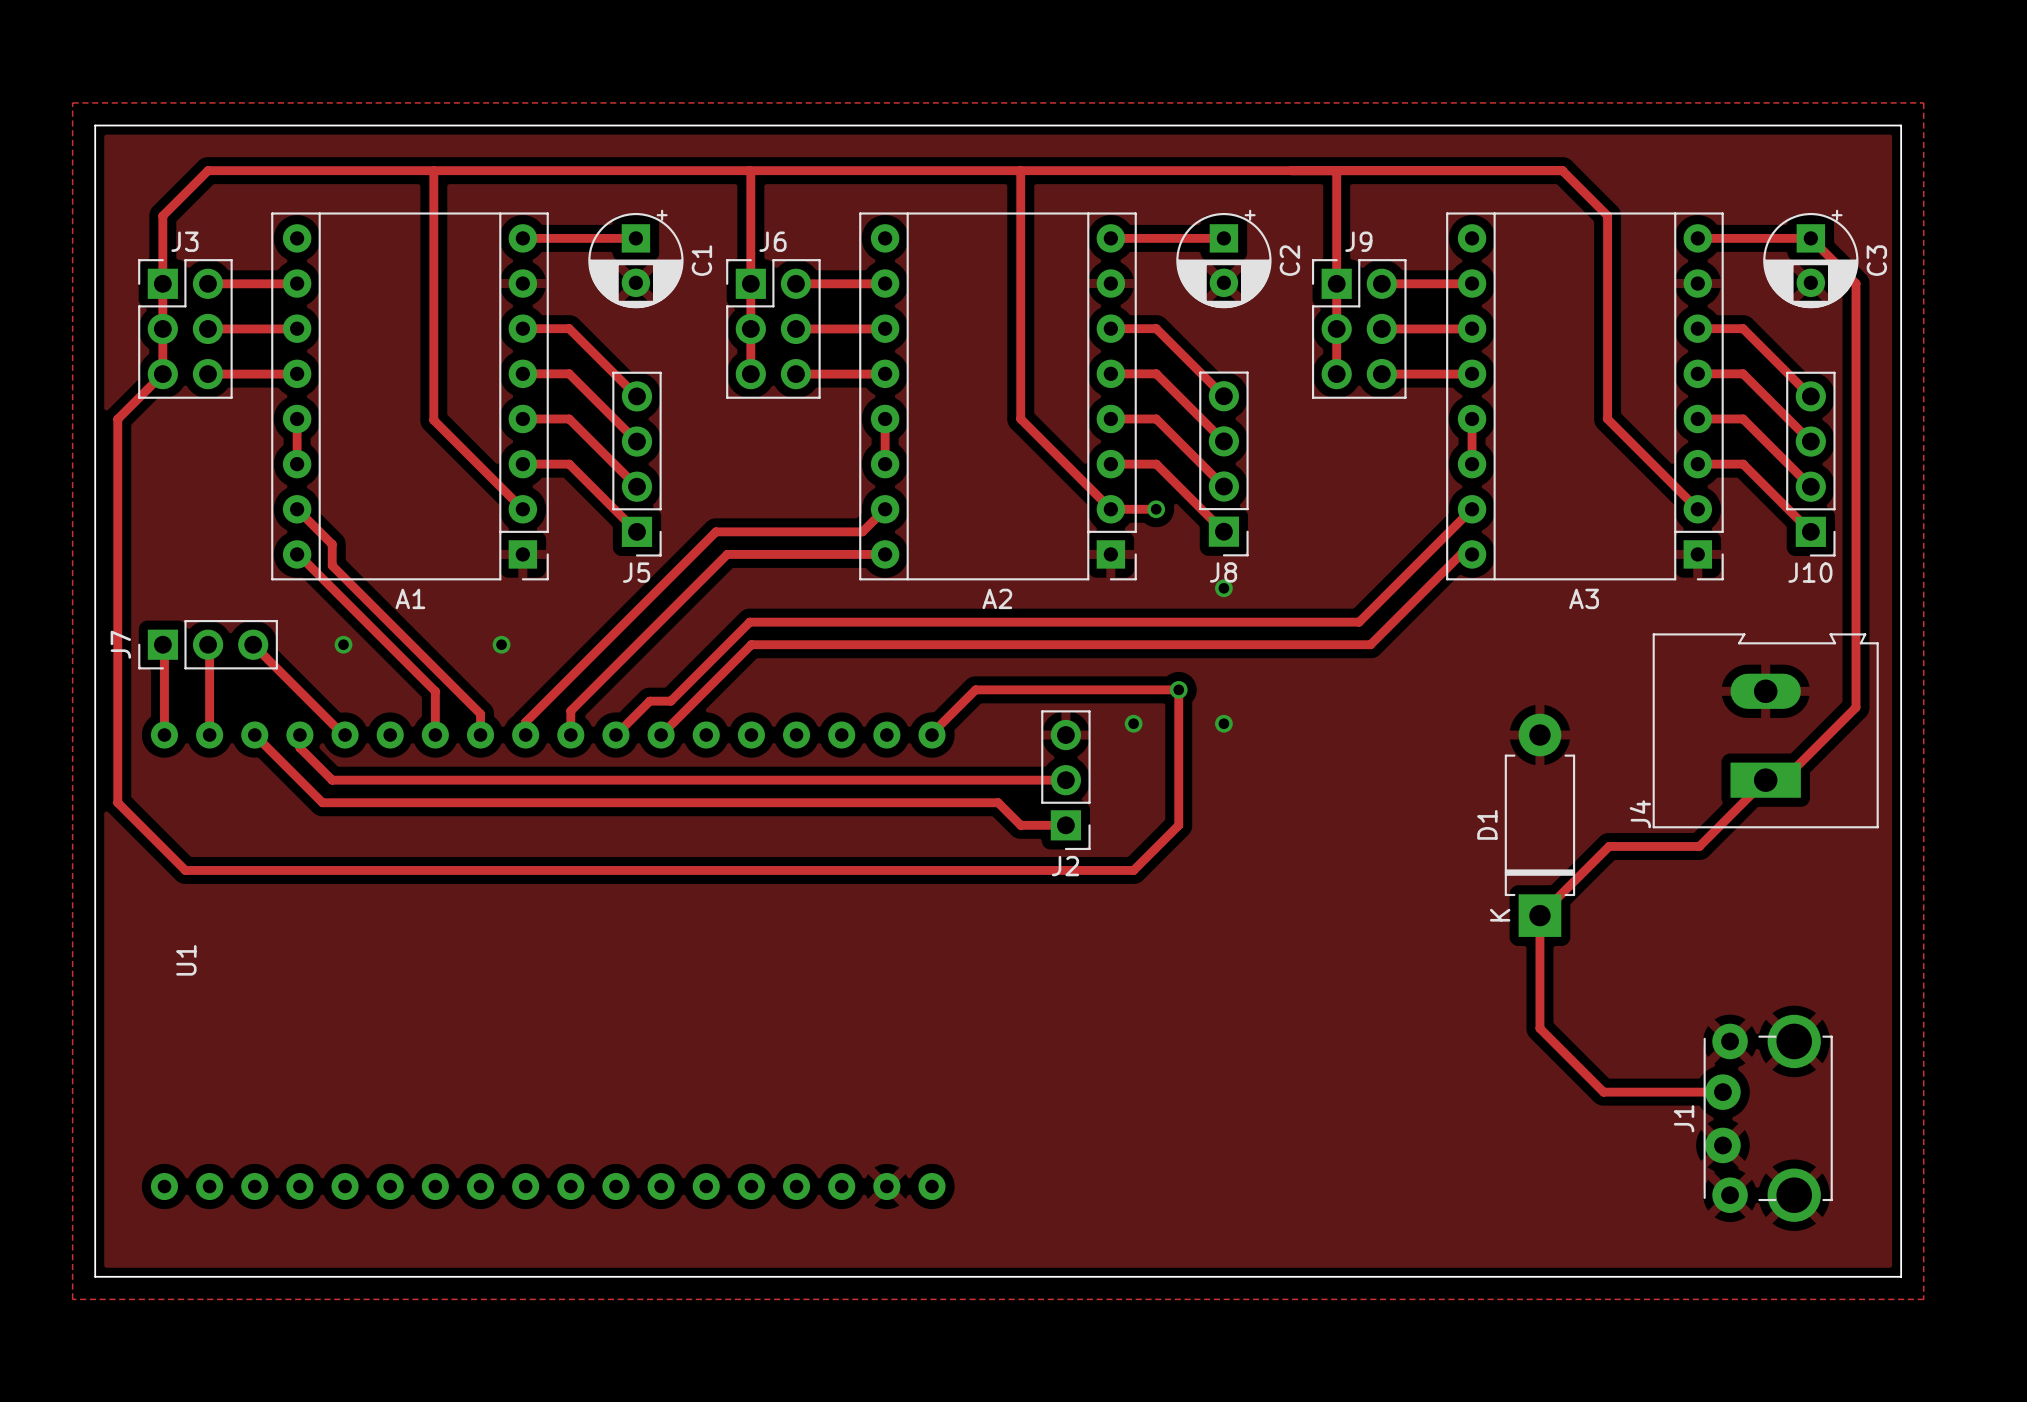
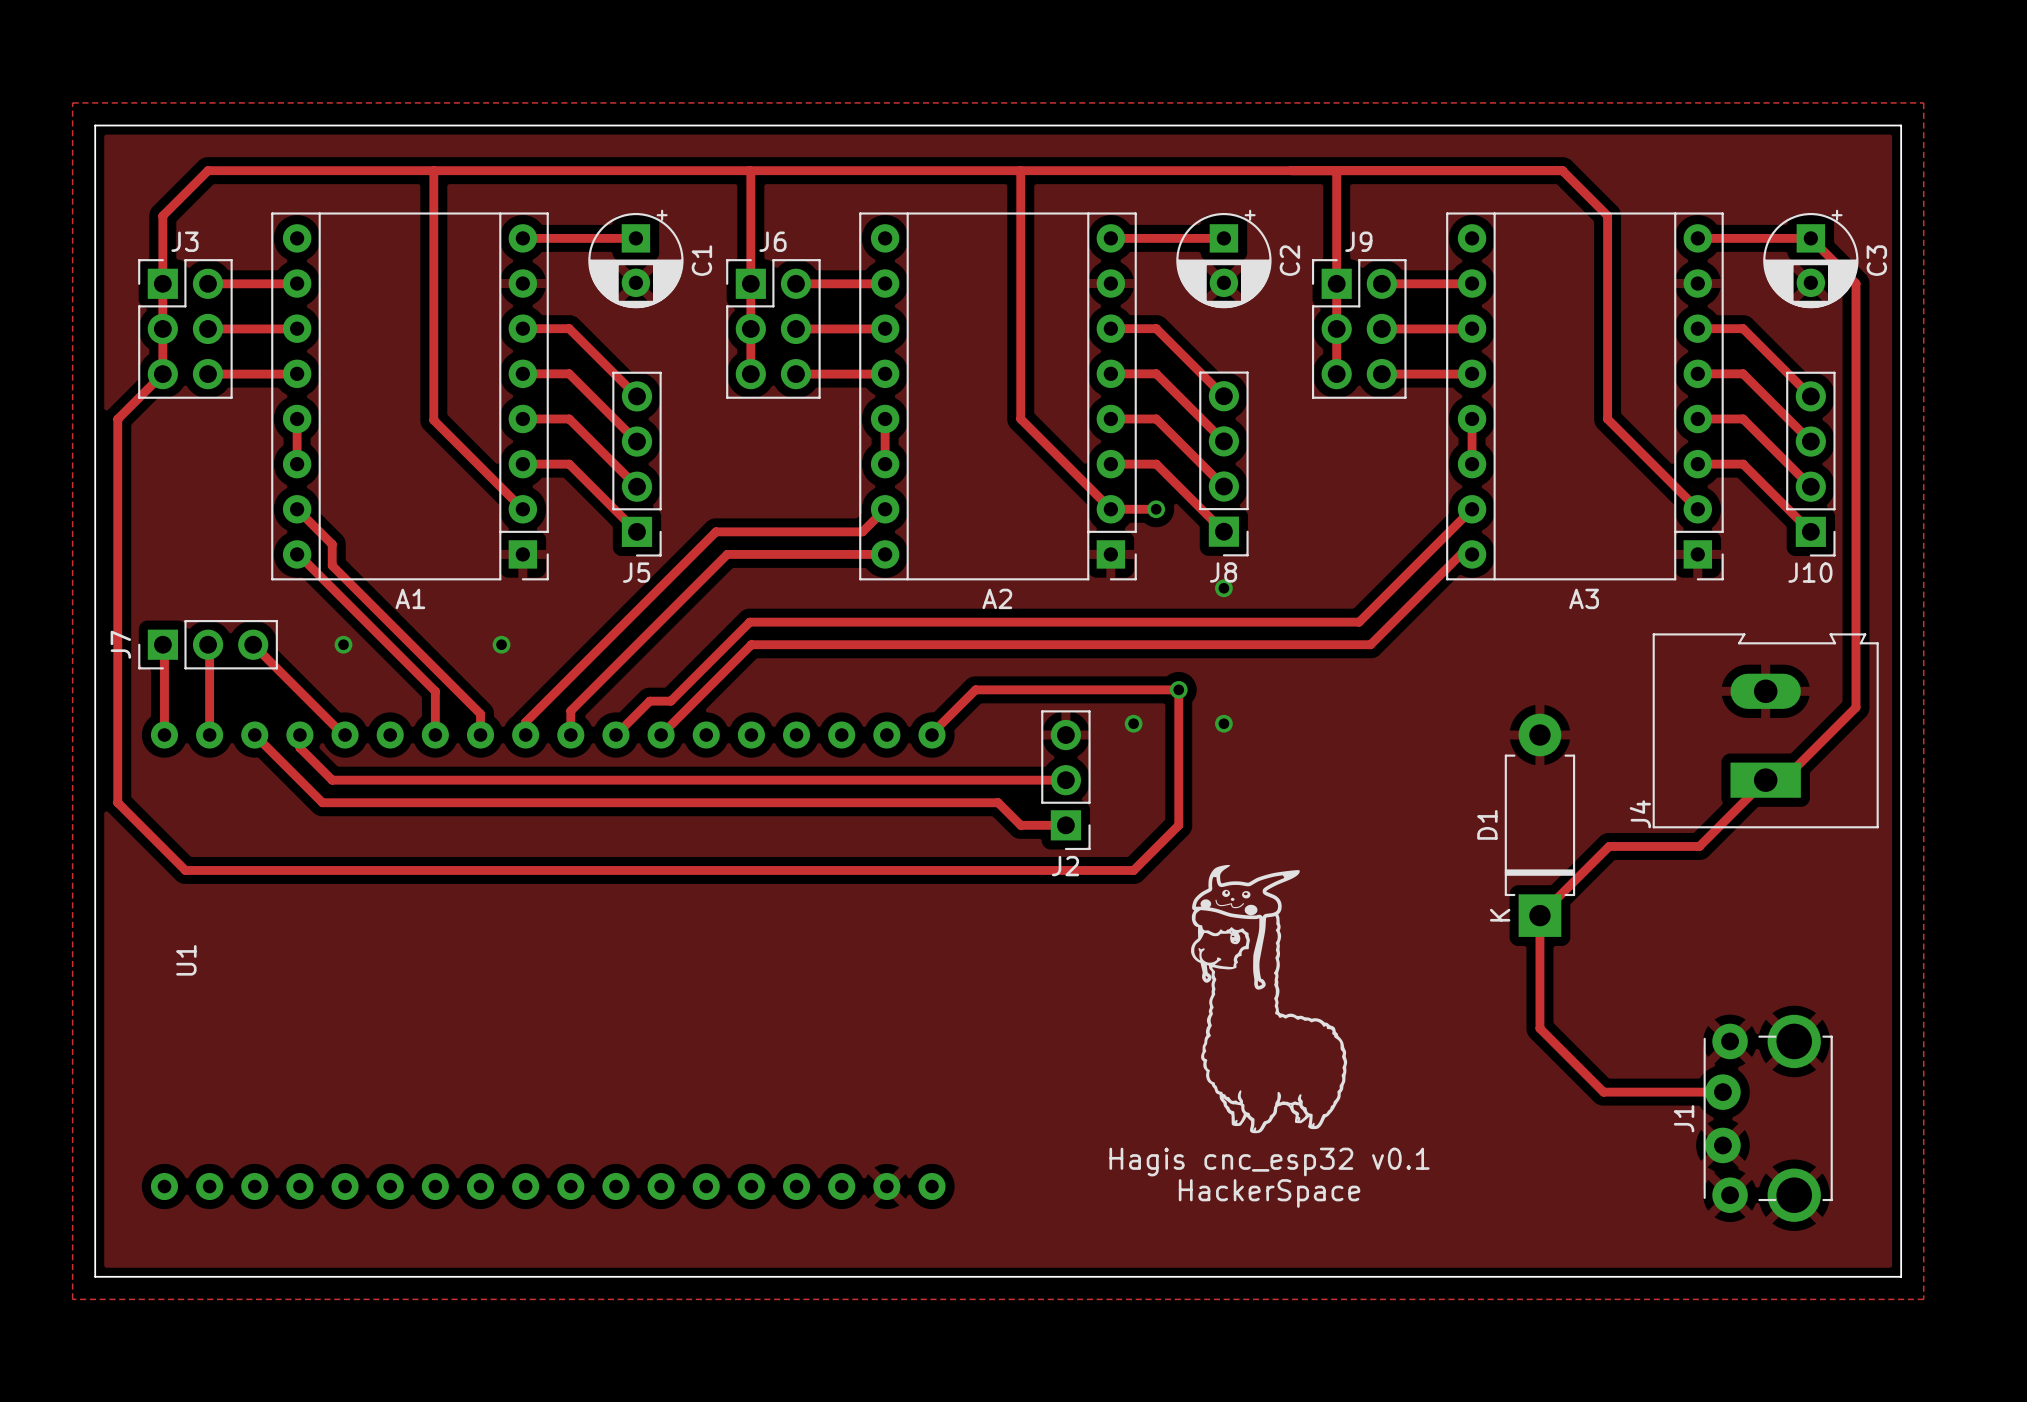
drawing: none -> [1191, 864, 1348, 1134]
text: none -> Hagis cnc_esp32 v0.1 (1269, 1162)
text: none -> HackerSpace (1269, 1193)

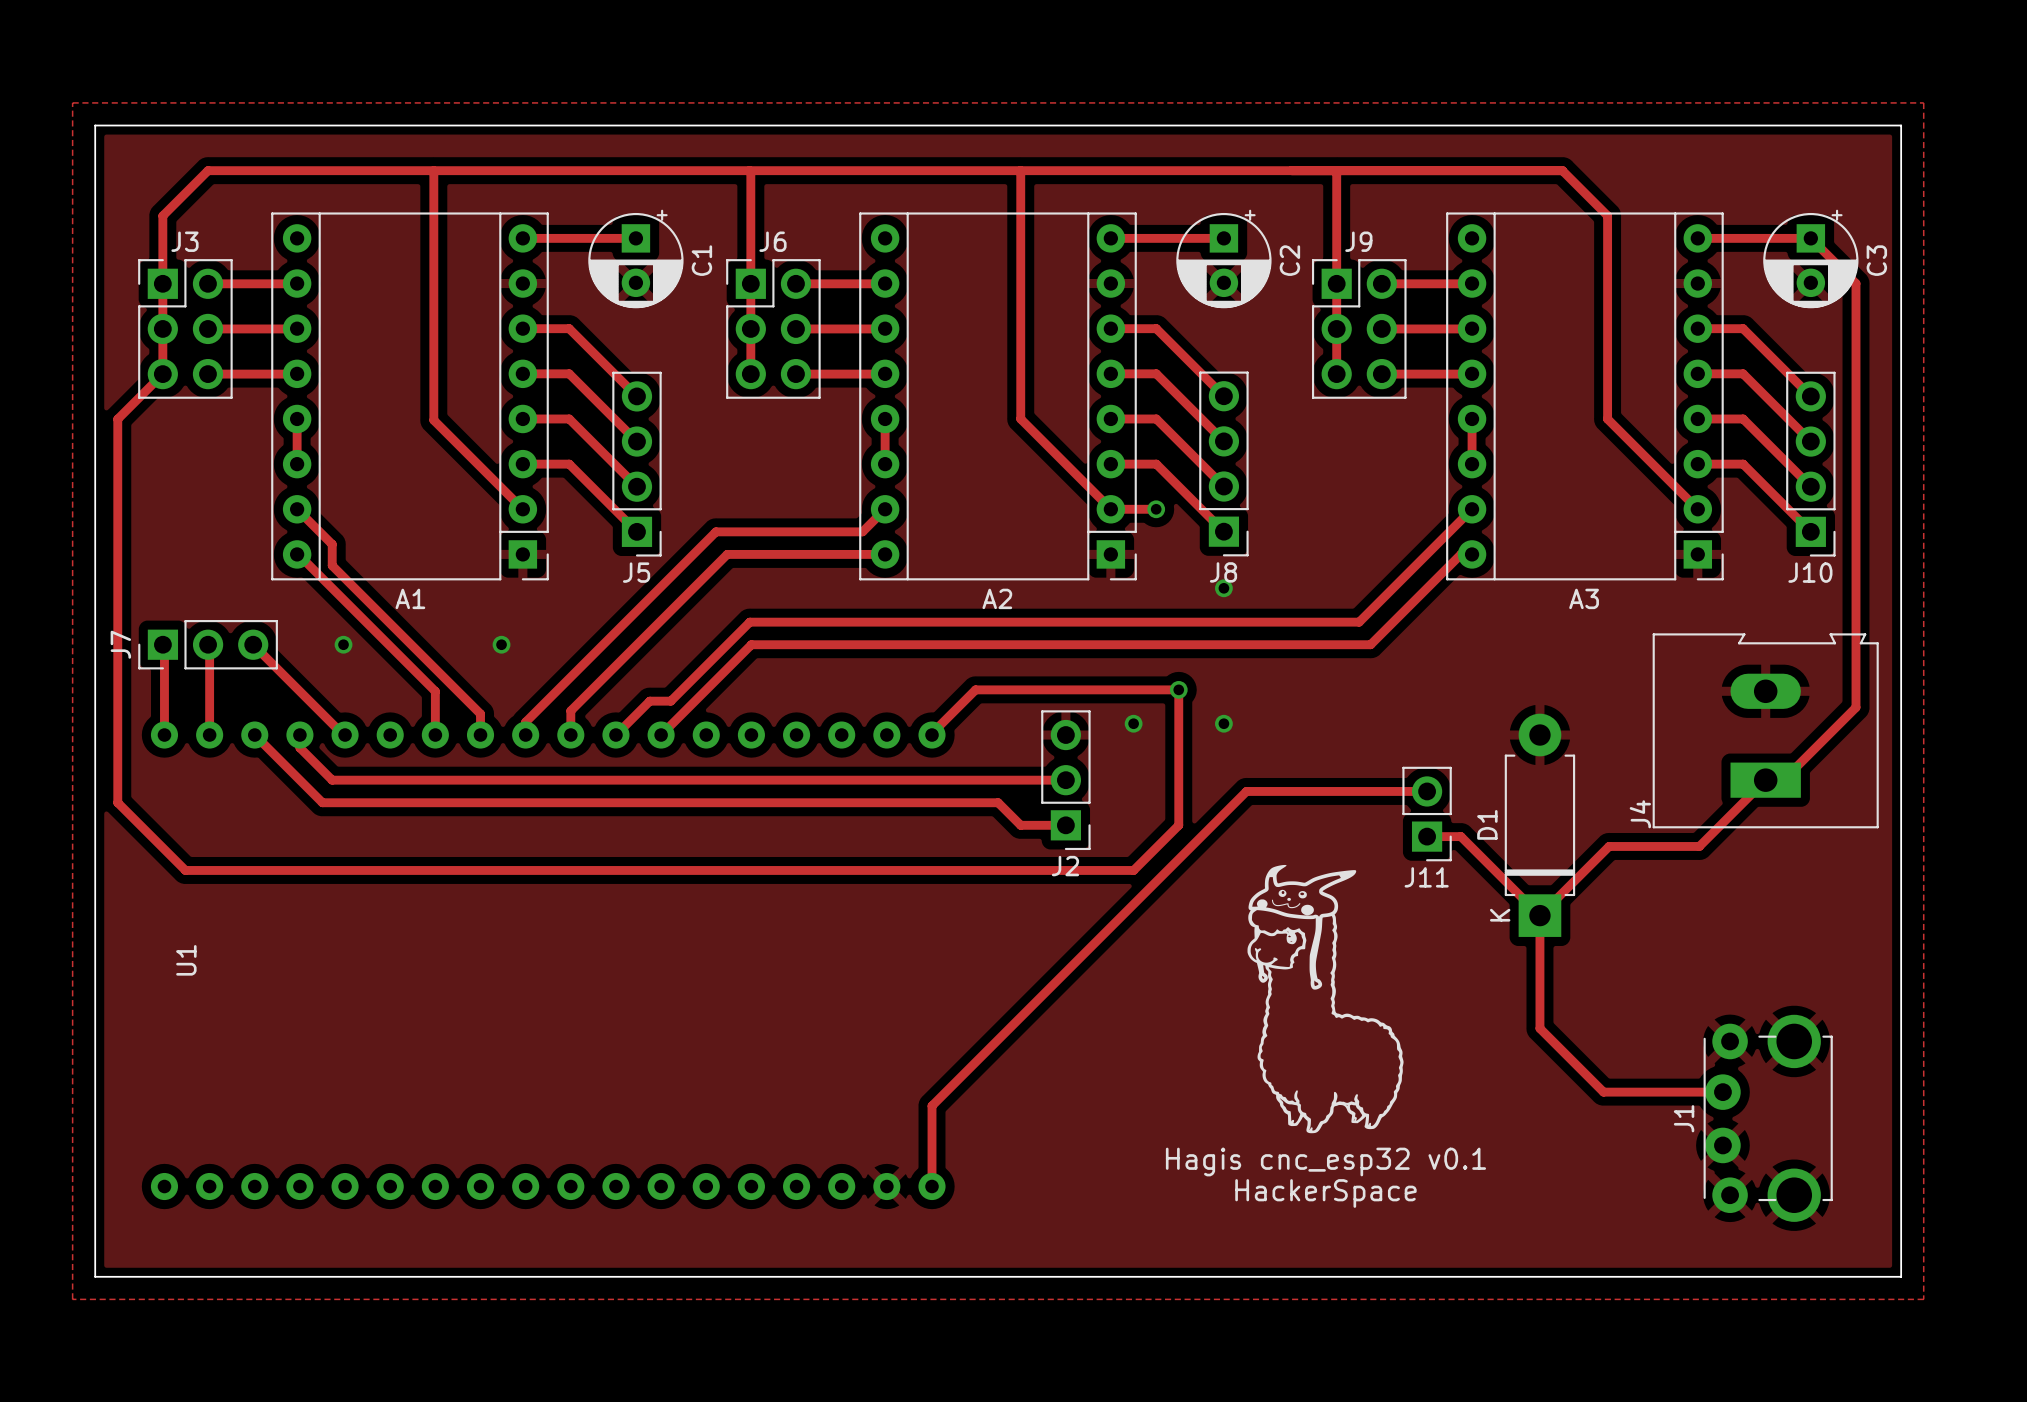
track: none -> (1427, 791) (1246, 791) (932, 1105) (932, 1186)
J11: none -> (1427, 814)
track: none -> (1427, 836) (1460, 836) (1539, 915)
drawing position: (1269, 999) -> (1325, 999)
text position: Hagis cnc_esp32 v0.1 (1269, 1162) -> Hagis cnc_esp32 v0.1 (1325, 1162)
text position: HackerSpace (1269, 1193) -> HackerSpace (1325, 1193)

